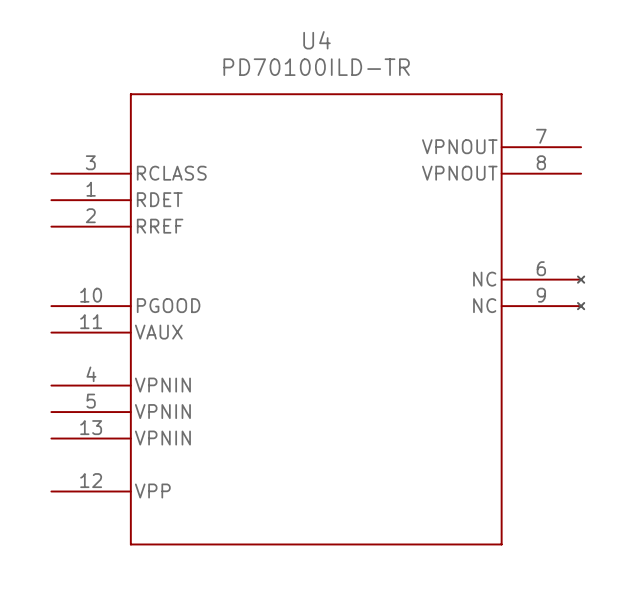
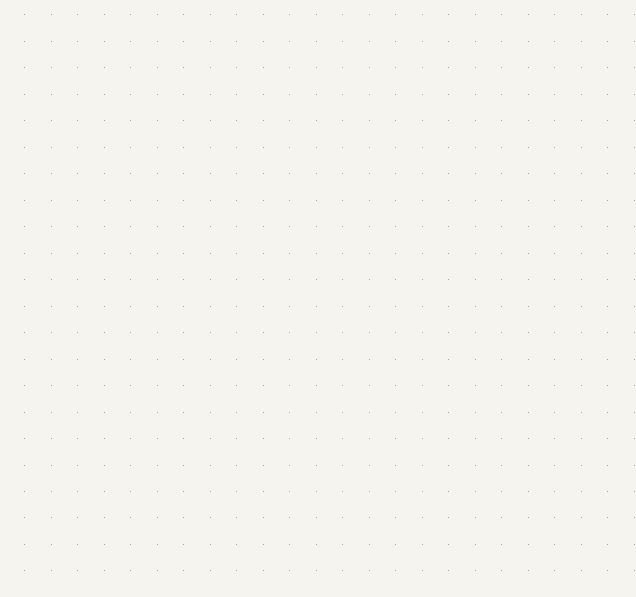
U4: PD70100ILD-TR (317, 319) -> none

